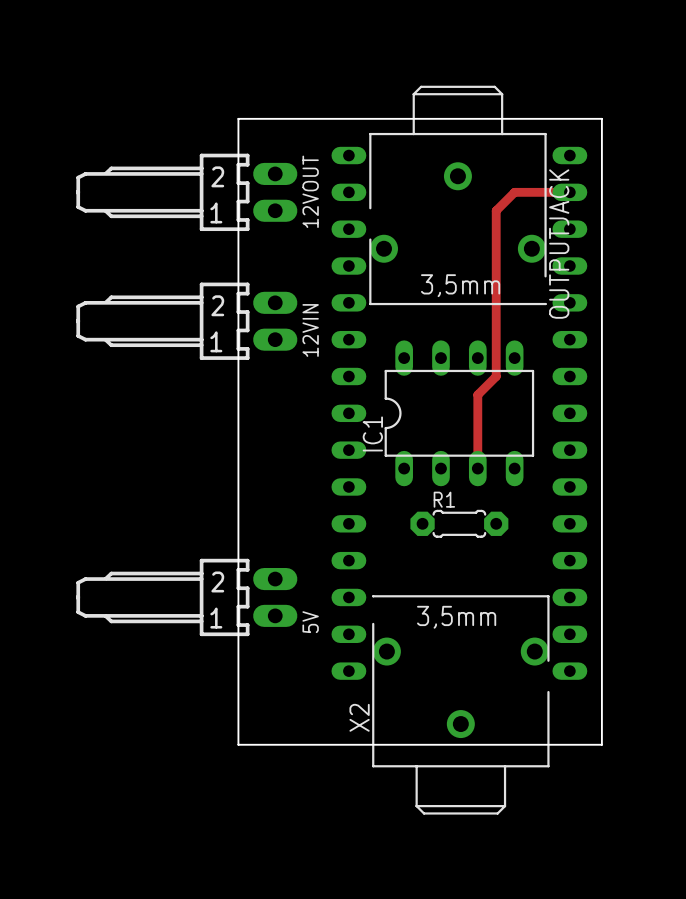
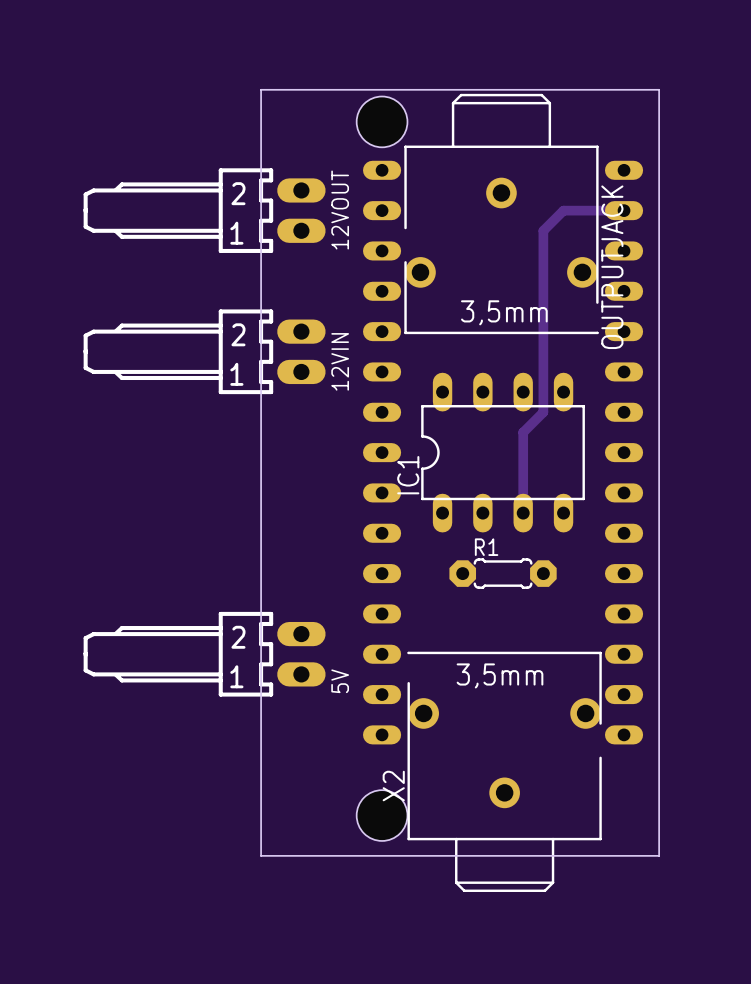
hole: none -> (382, 121)
board edge: (238, 118) (601, 118) -> (261, 130) (261, 89) (659, 89) (659, 130)
board edge: (238, 744) (601, 744) -> (261, 815) (261, 855) (659, 855) (659, 815)
hole: none -> (382, 815)

